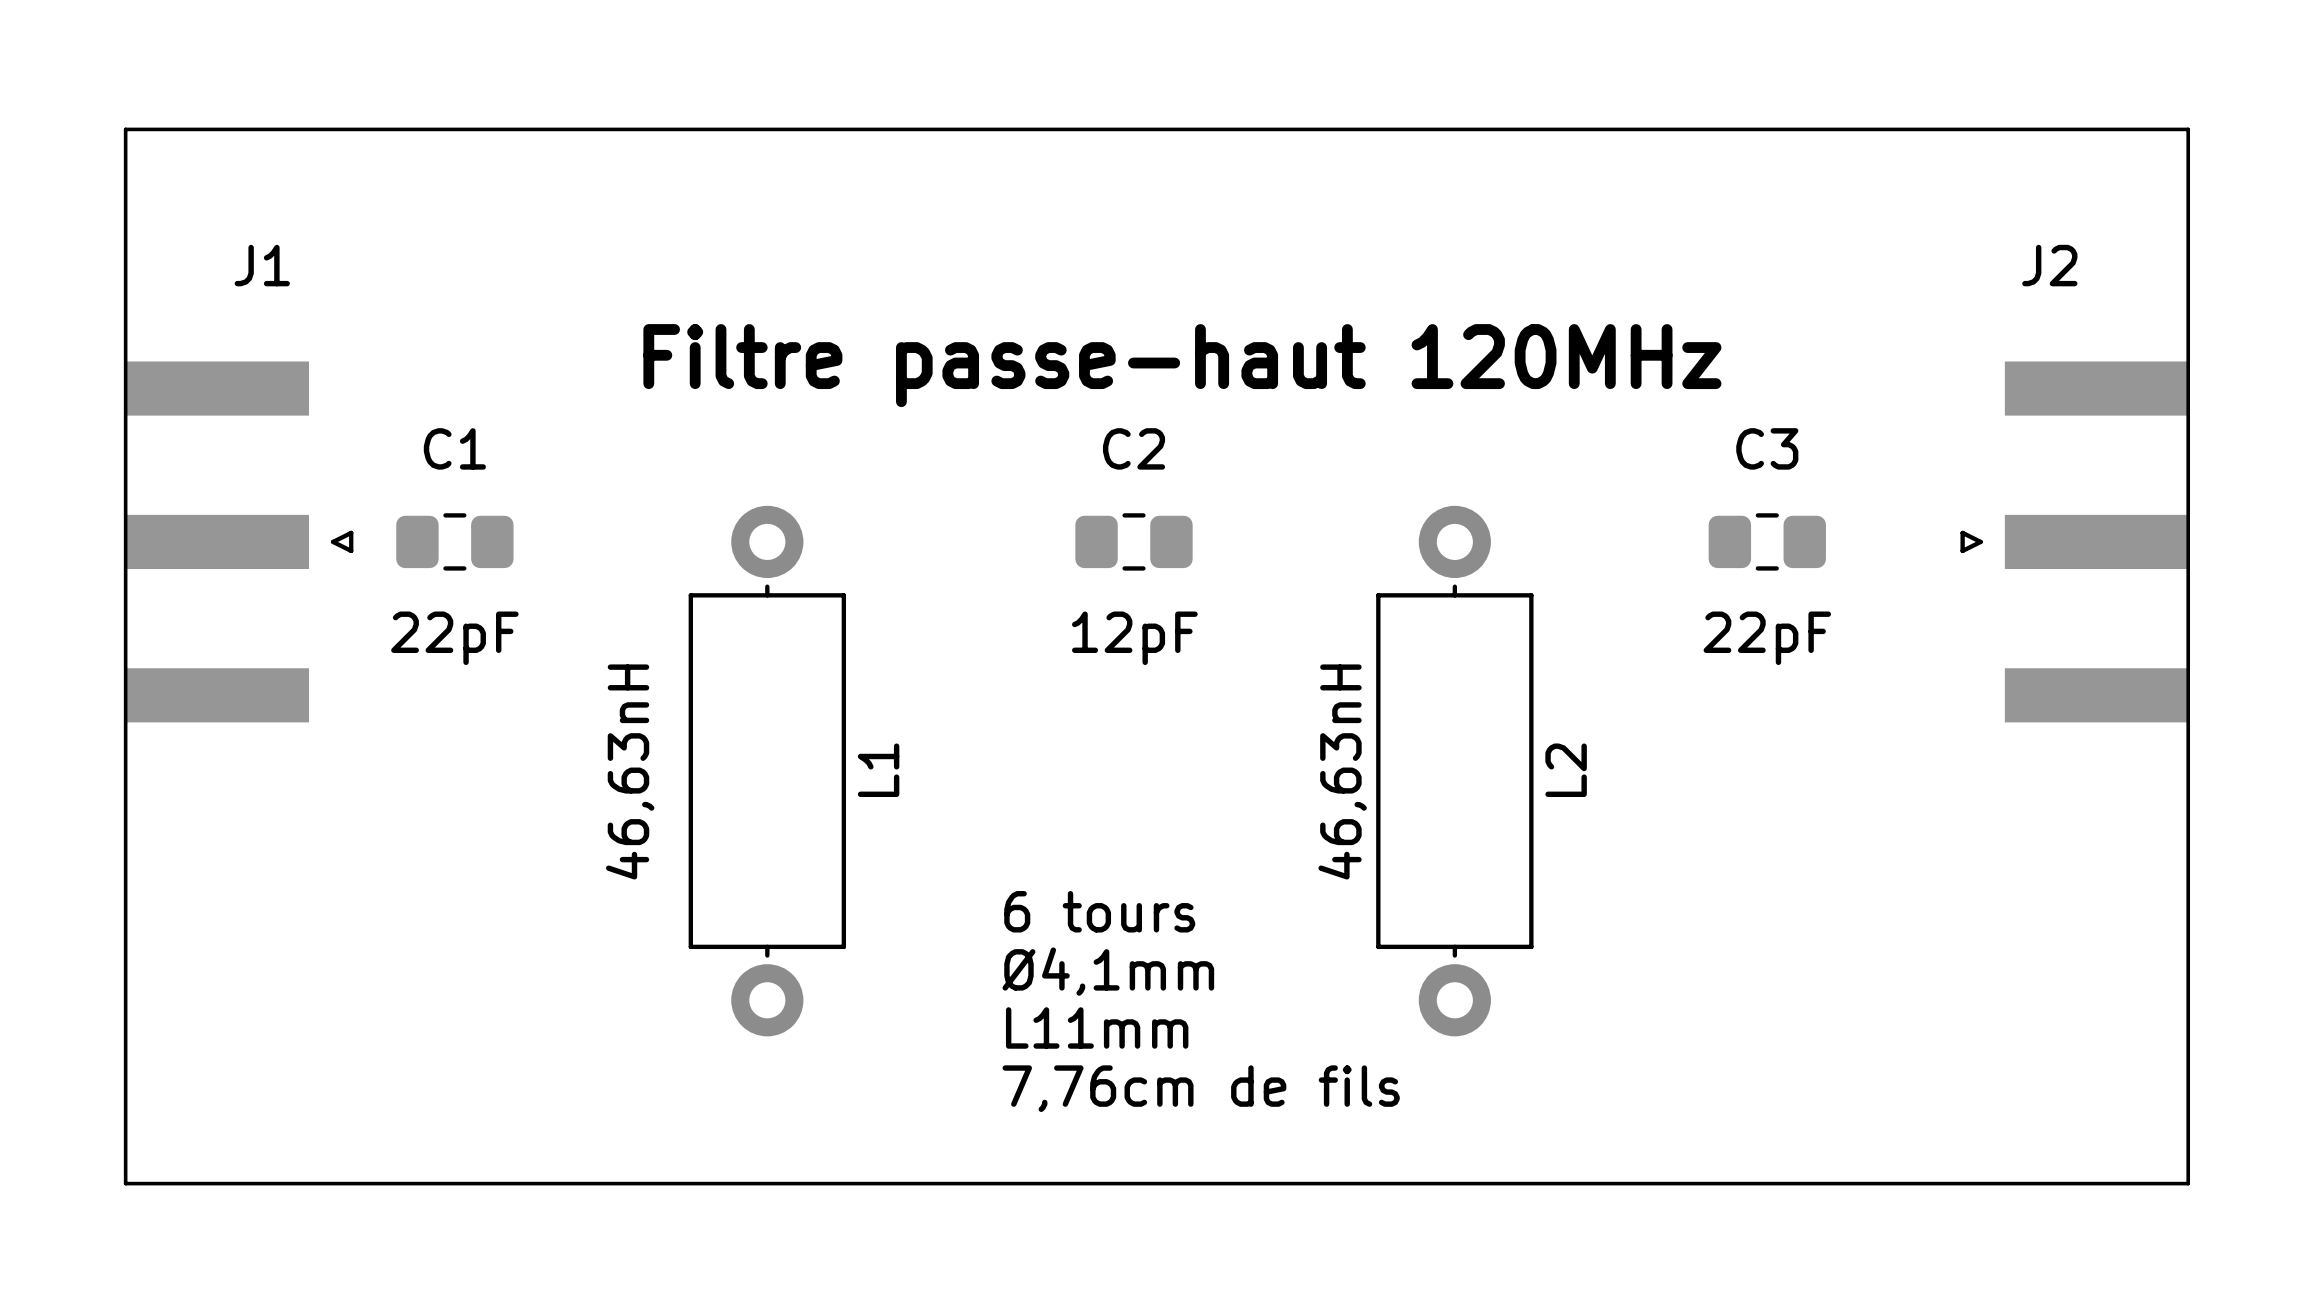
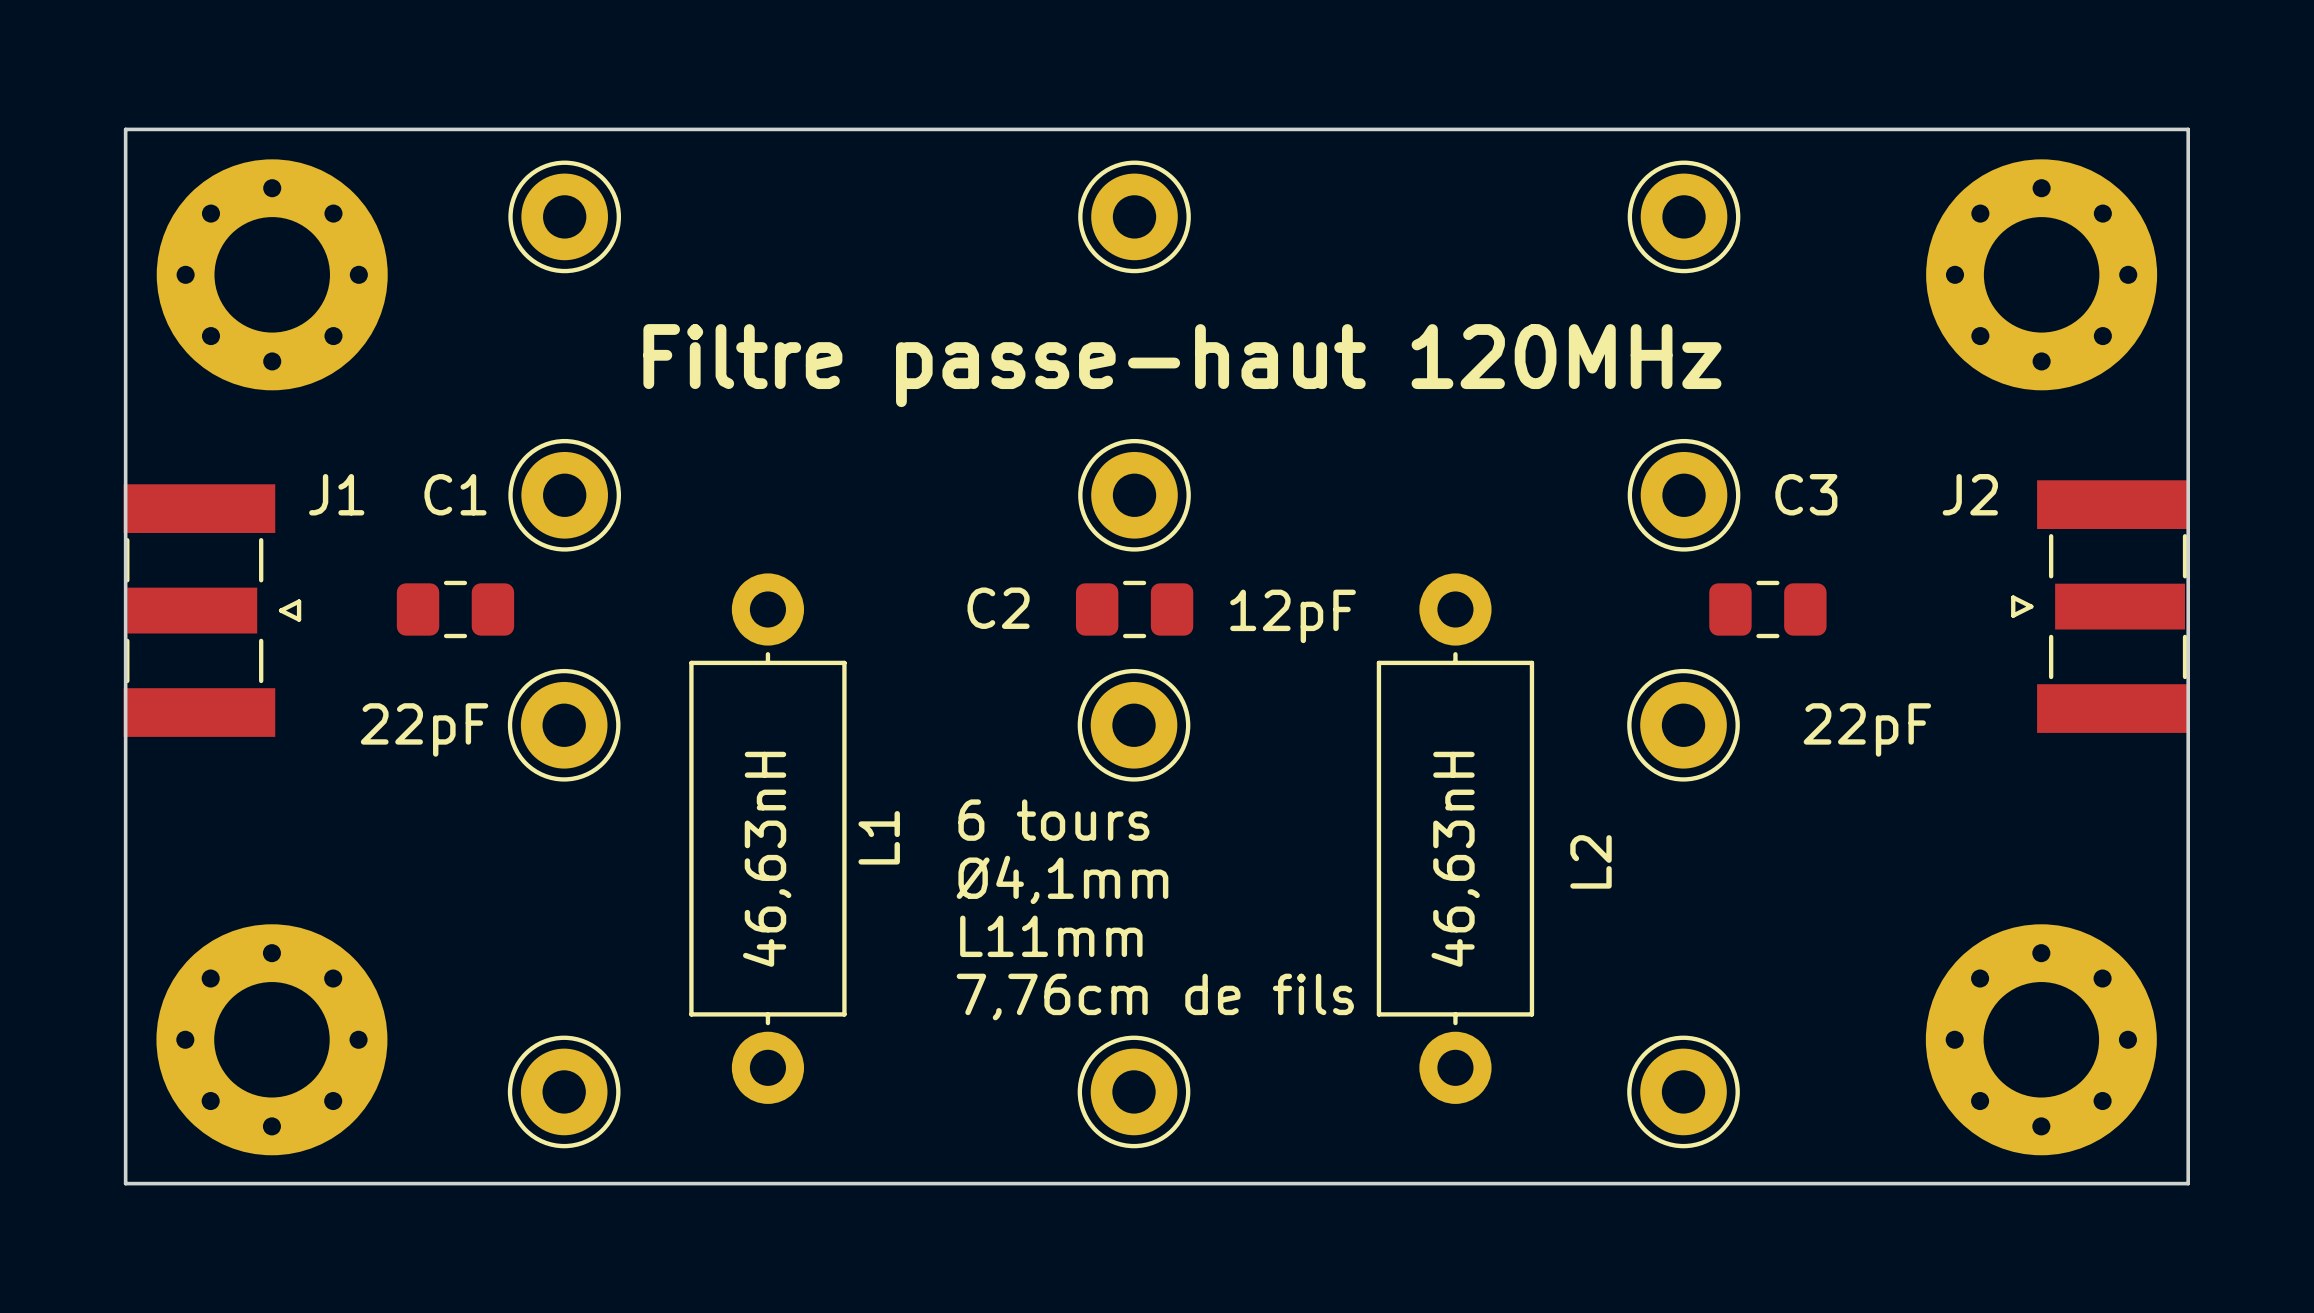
part: none -> (564, 216)
part: none -> (1134, 216)
part: none -> (1684, 216)
J1 name position: J1 (262, 265) -> J1 (336, 494)
J2 name position: J2 (2049, 265) -> J2 (1970, 494)
part: none -> (272, 274)
part: none -> (2041, 274)
J1 footprint: [125, 361, 354, 723] -> [123, 484, 302, 737]
J2 footprint: [1960, 361, 2189, 723] -> [2011, 480, 2189, 733]
C1 name position: C1 (454, 448) -> C1 (455, 494)
C2 name position: C2 (1134, 448) -> C2 (998, 608)
C3 name position: C3 (1767, 448) -> C3 (1806, 494)
part: none -> (564, 495)
part: none -> (1134, 495)
part: none -> (1684, 495)
C1 position: (454, 541) -> (455, 609)
C2 position: (1134, 541) -> (1134, 609)
C3 position: (1767, 541) -> (1767, 609)
C1 value position: 22pF (454, 638) -> 22pF (424, 729)
C2 value position: 12pF (1134, 638) -> 12pF (1293, 616)
C3 value position: 22pF (1767, 638) -> 22pF (1867, 729)
part: none -> (564, 725)
part: none -> (1134, 725)
part: none -> (1683, 725)
L2 name position: L2 (1566, 770) -> L2 (1591, 861)
L1 value position: 46,63nH (630, 771) -> 46,63nH (767, 859)
L1 position: (767, 771) -> (767, 838)
L2 value position: 46,63nH (1342, 771) -> 46,63nH (1455, 859)
L2 position: (1454, 771) -> (1455, 838)
text position: 6 tours (1099, 911) -> 6 tours (1053, 820)
text position: Ø4,1mm (1108, 971) -> Ø4,1mm (1062, 879)
text position: L11mm (1097, 1027) -> L11mm (1051, 936)
part: none -> (271, 1039)
part: none -> (2041, 1039)
text position: 7,76cm de fils (1201, 1088) -> 7,76cm de fils (1155, 996)
part: none -> (564, 1091)
part: none -> (1134, 1091)
part: none -> (1683, 1091)

